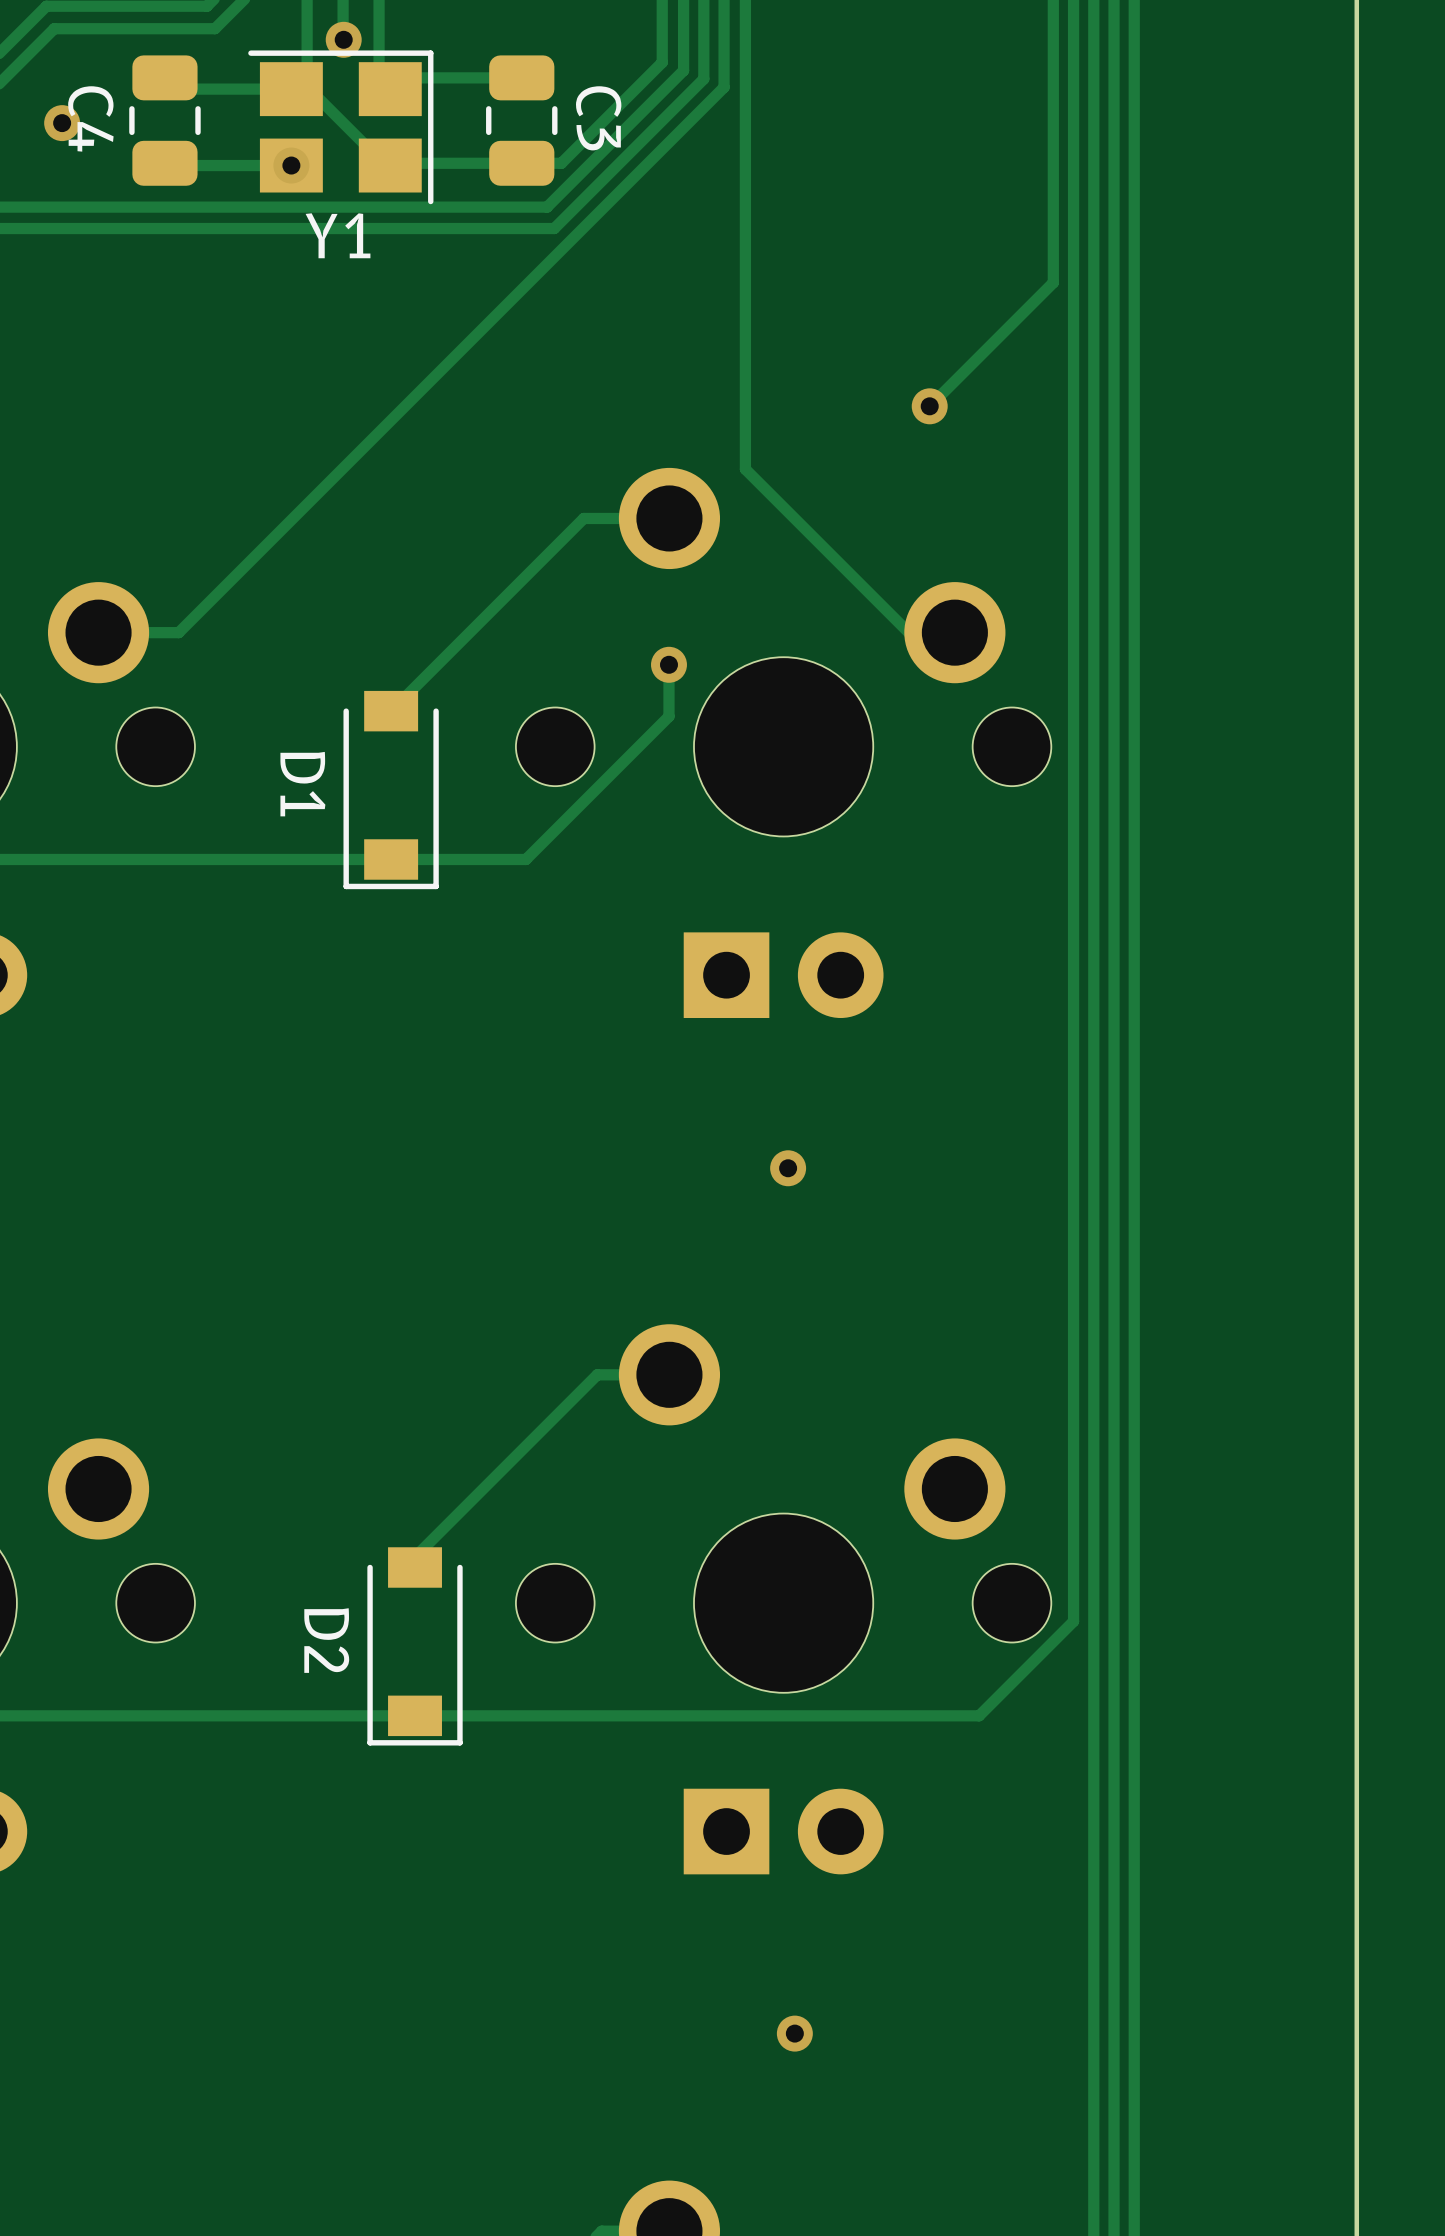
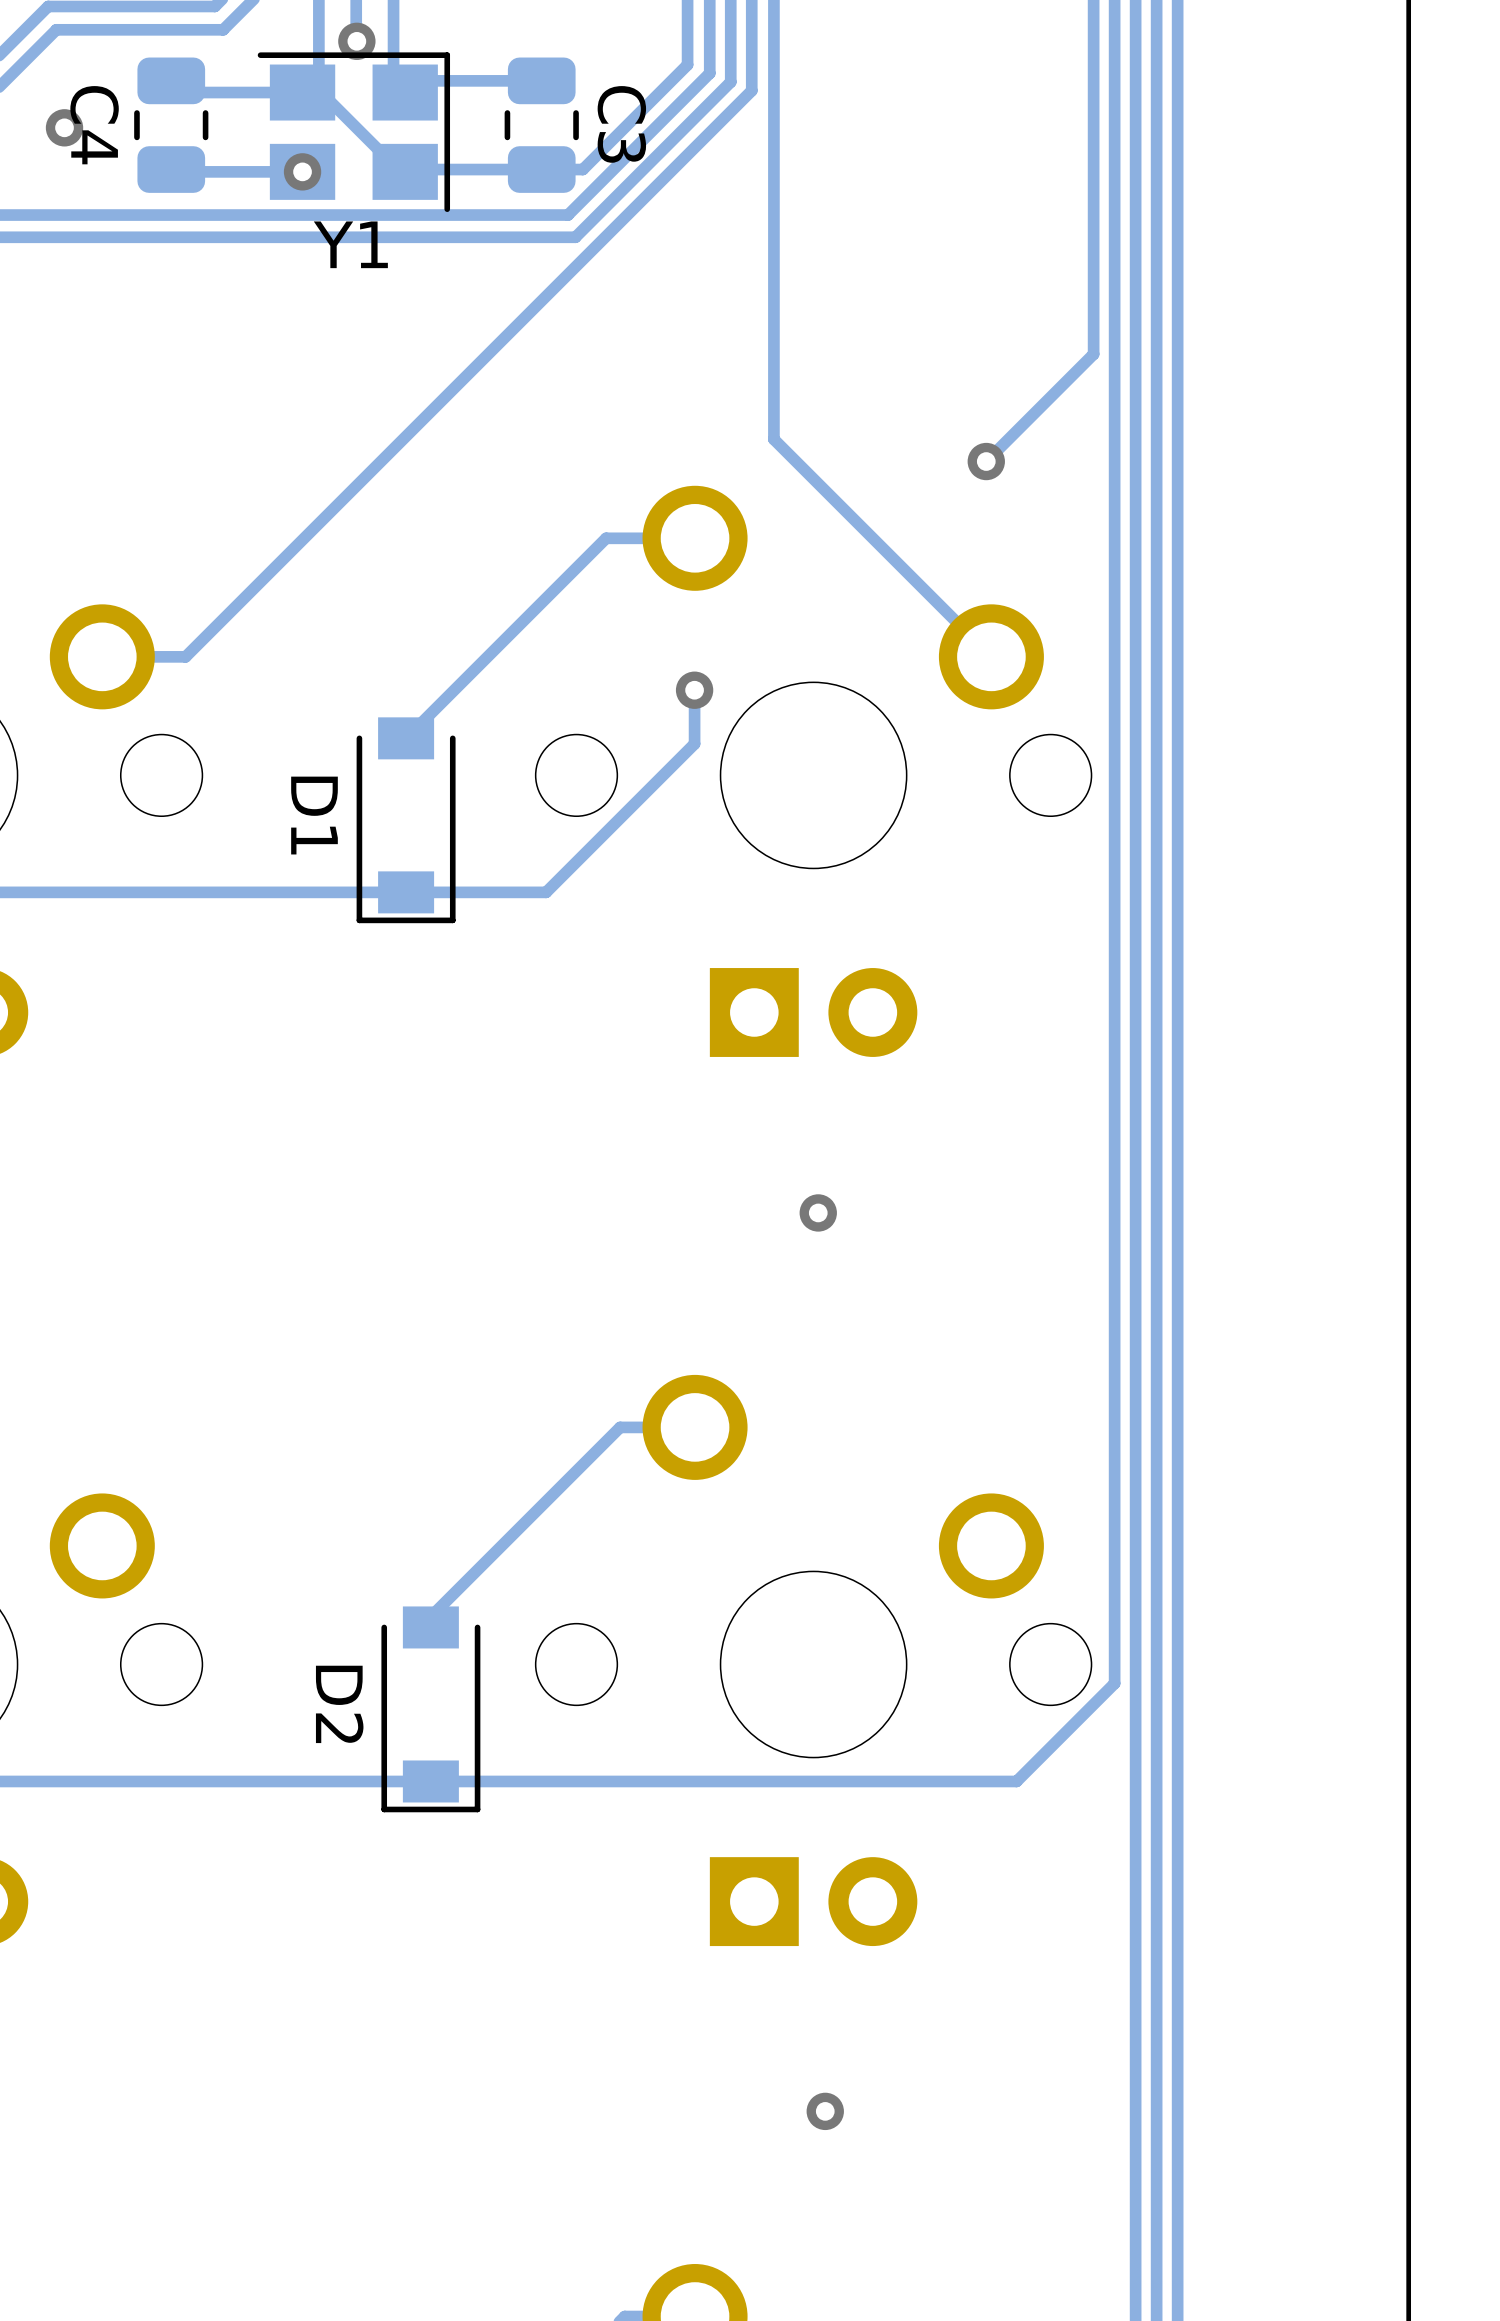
track: (1053, 282) (929, 406) -> (1093, 293) (1093, 354) (986, 461)
via position: (929, 406) -> (986, 461)
track: (745, 423) (745, 469) (908, 632) (954, 632) -> (773, 439) (991, 656)

